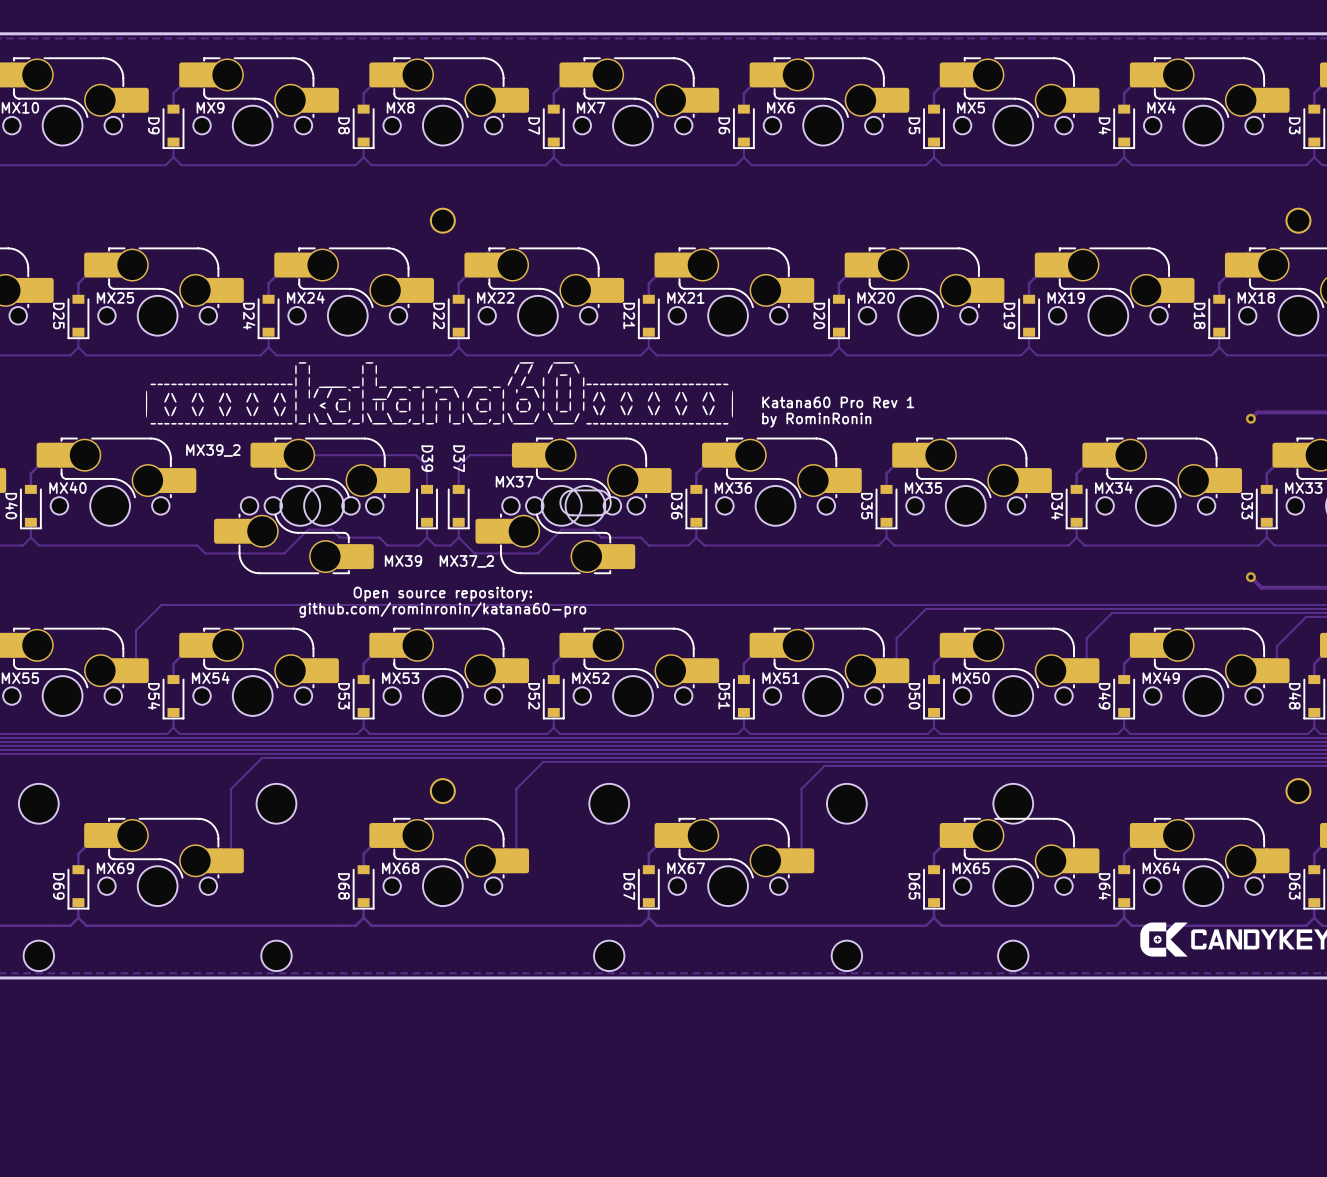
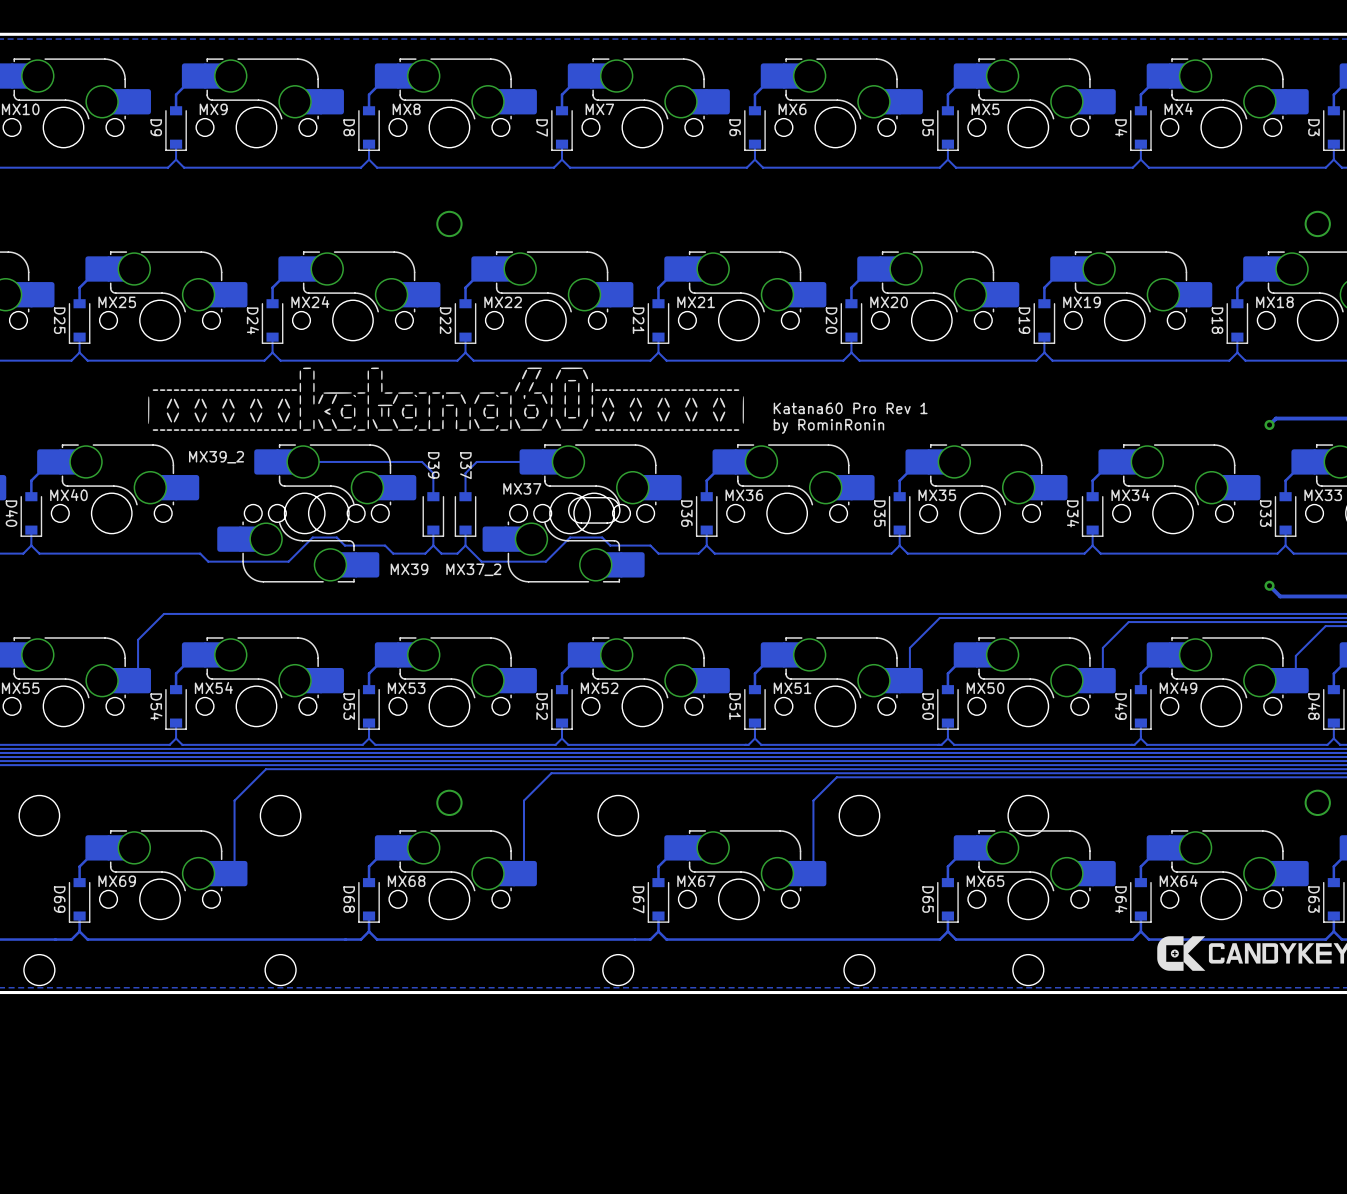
text: Open source repository: (442, 594) -> none
text: github.com/rominronin/katana60-pro (442, 610) -> none

